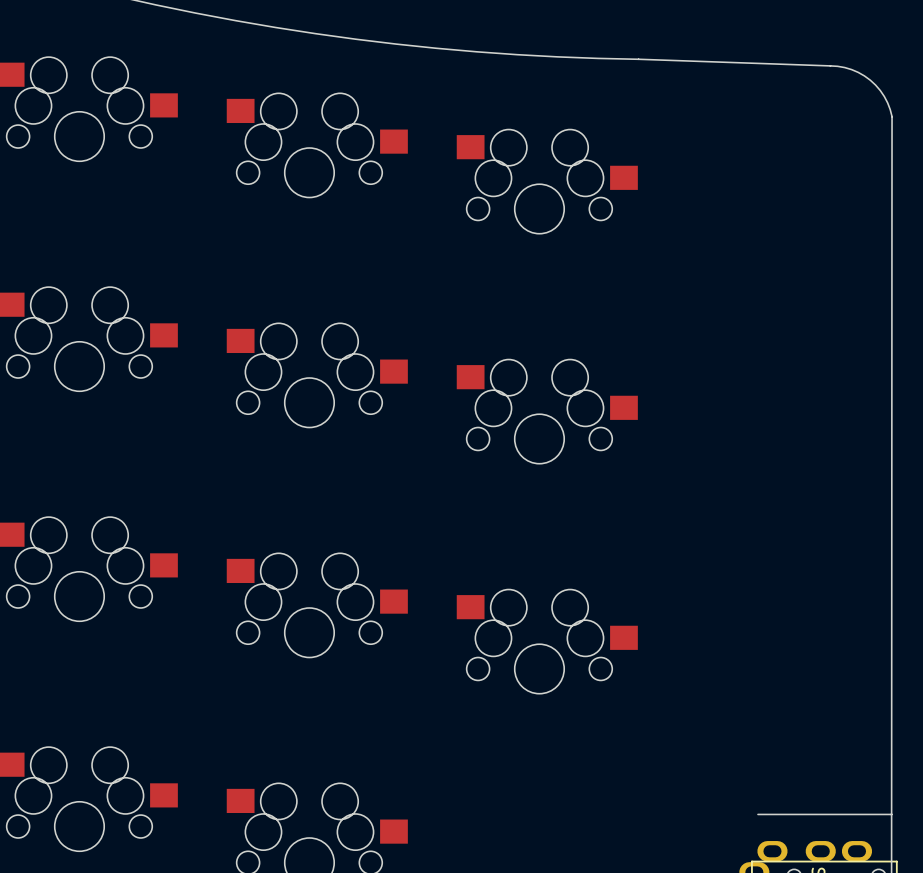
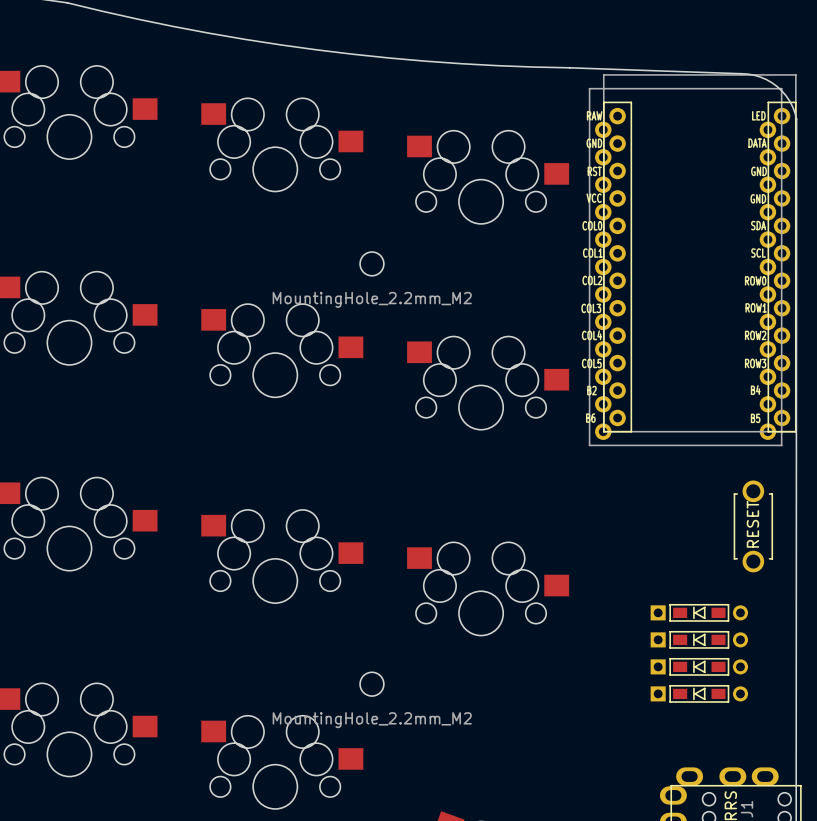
part: none -> (692, 260)
part: none -> MountingHole_2.2mm_M2 (371, 263)
part: none -> (753, 526)
part: none -> (699, 612)
part: none -> (699, 639)
part: none -> (699, 666)
part: none -> MountingHole_2.2mm_M2 (371, 684)
part: none -> (699, 693)
board edge: (757, 814) (892, 814) -> none

